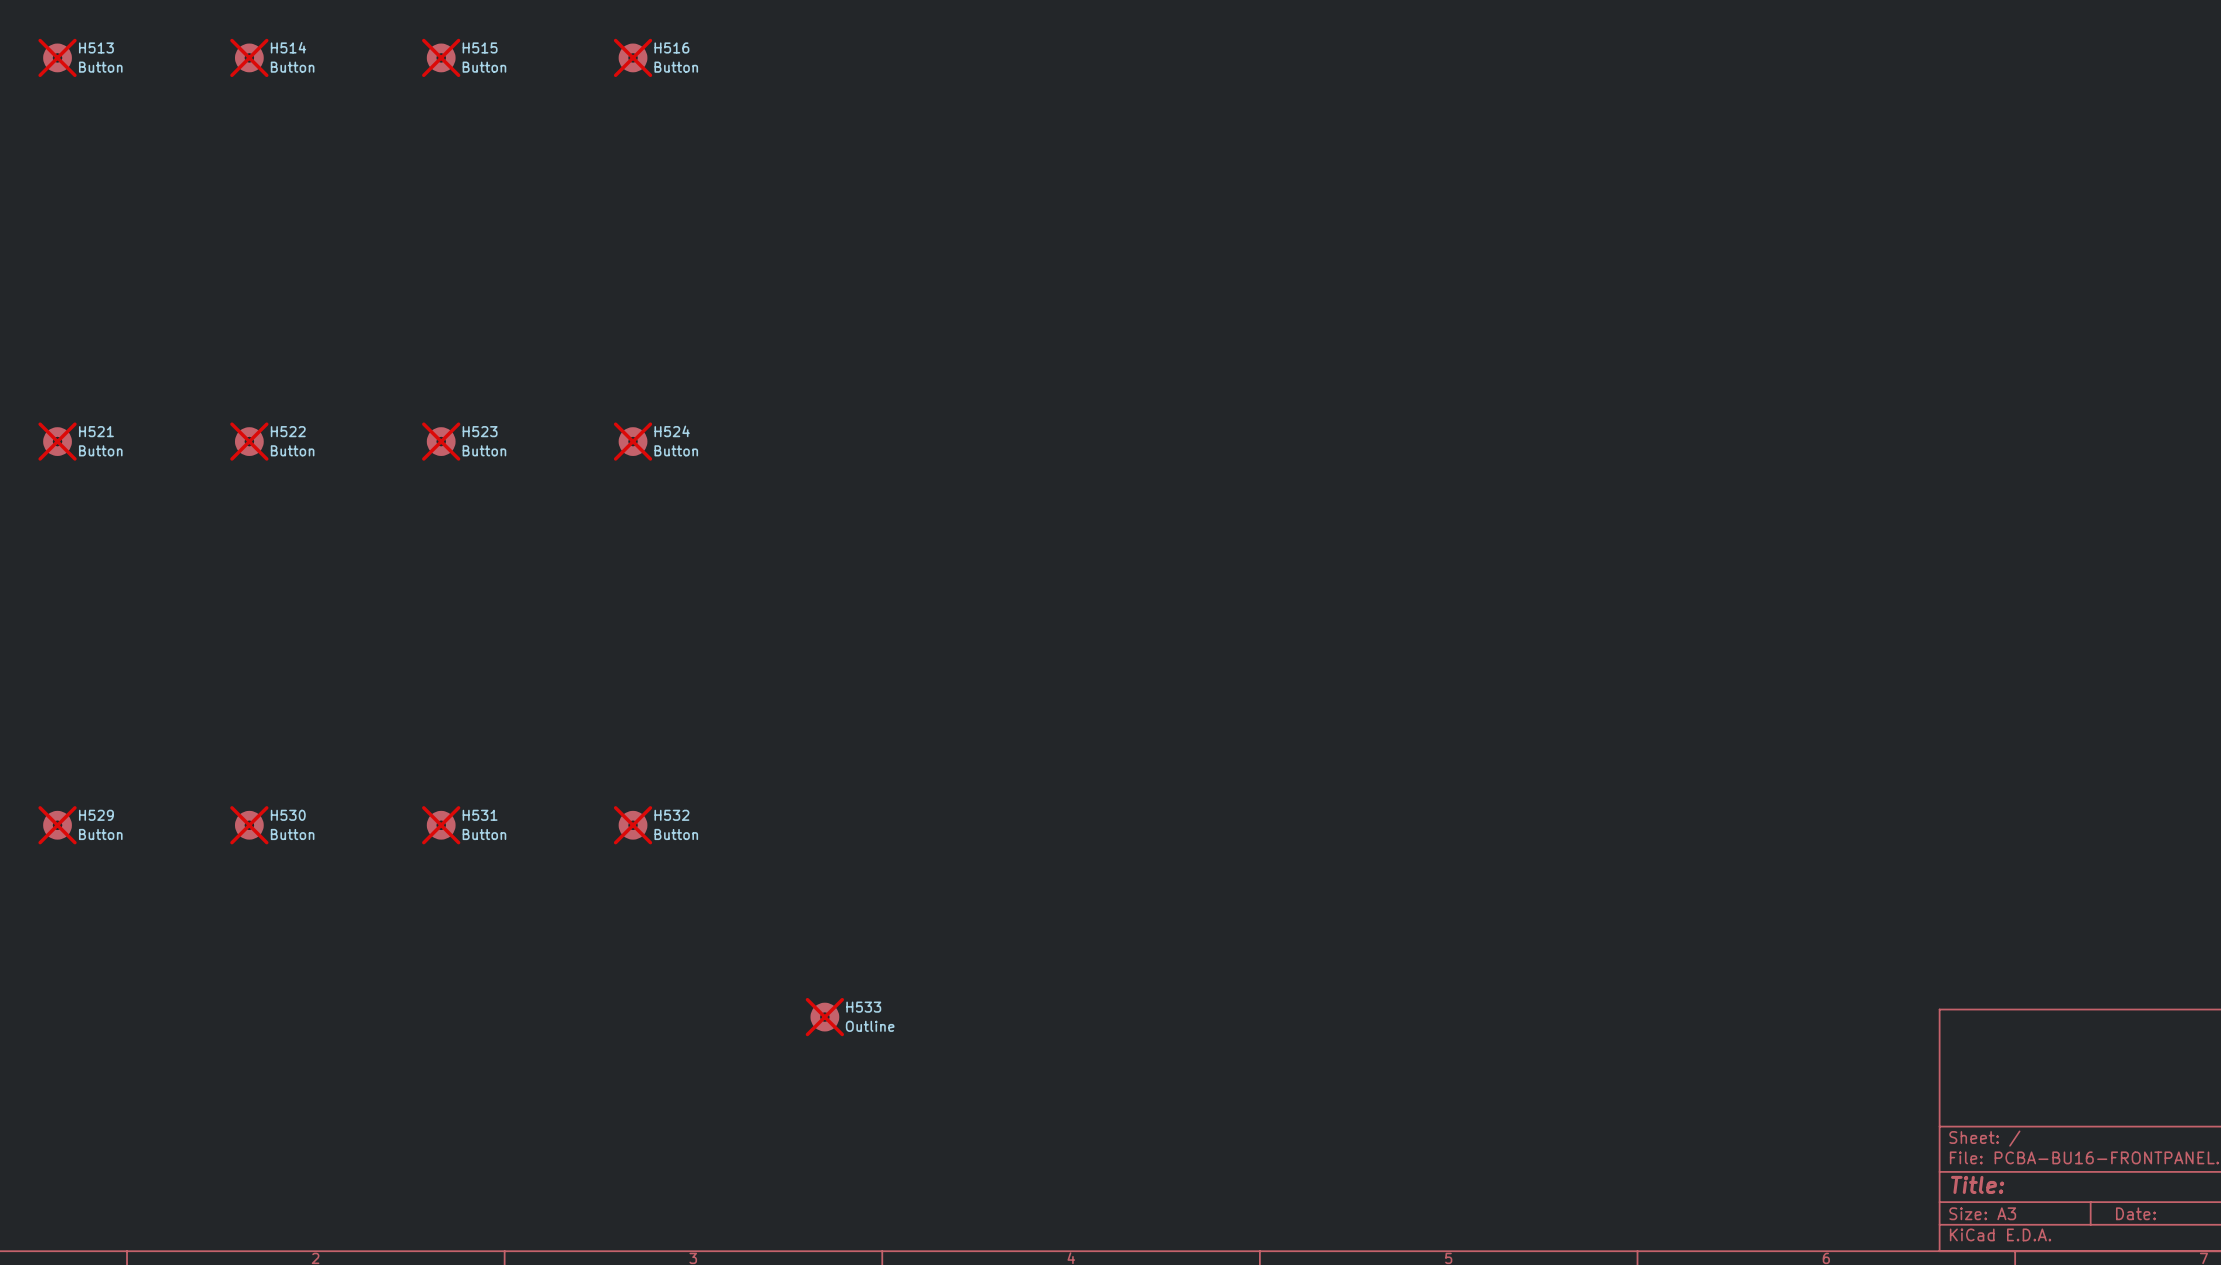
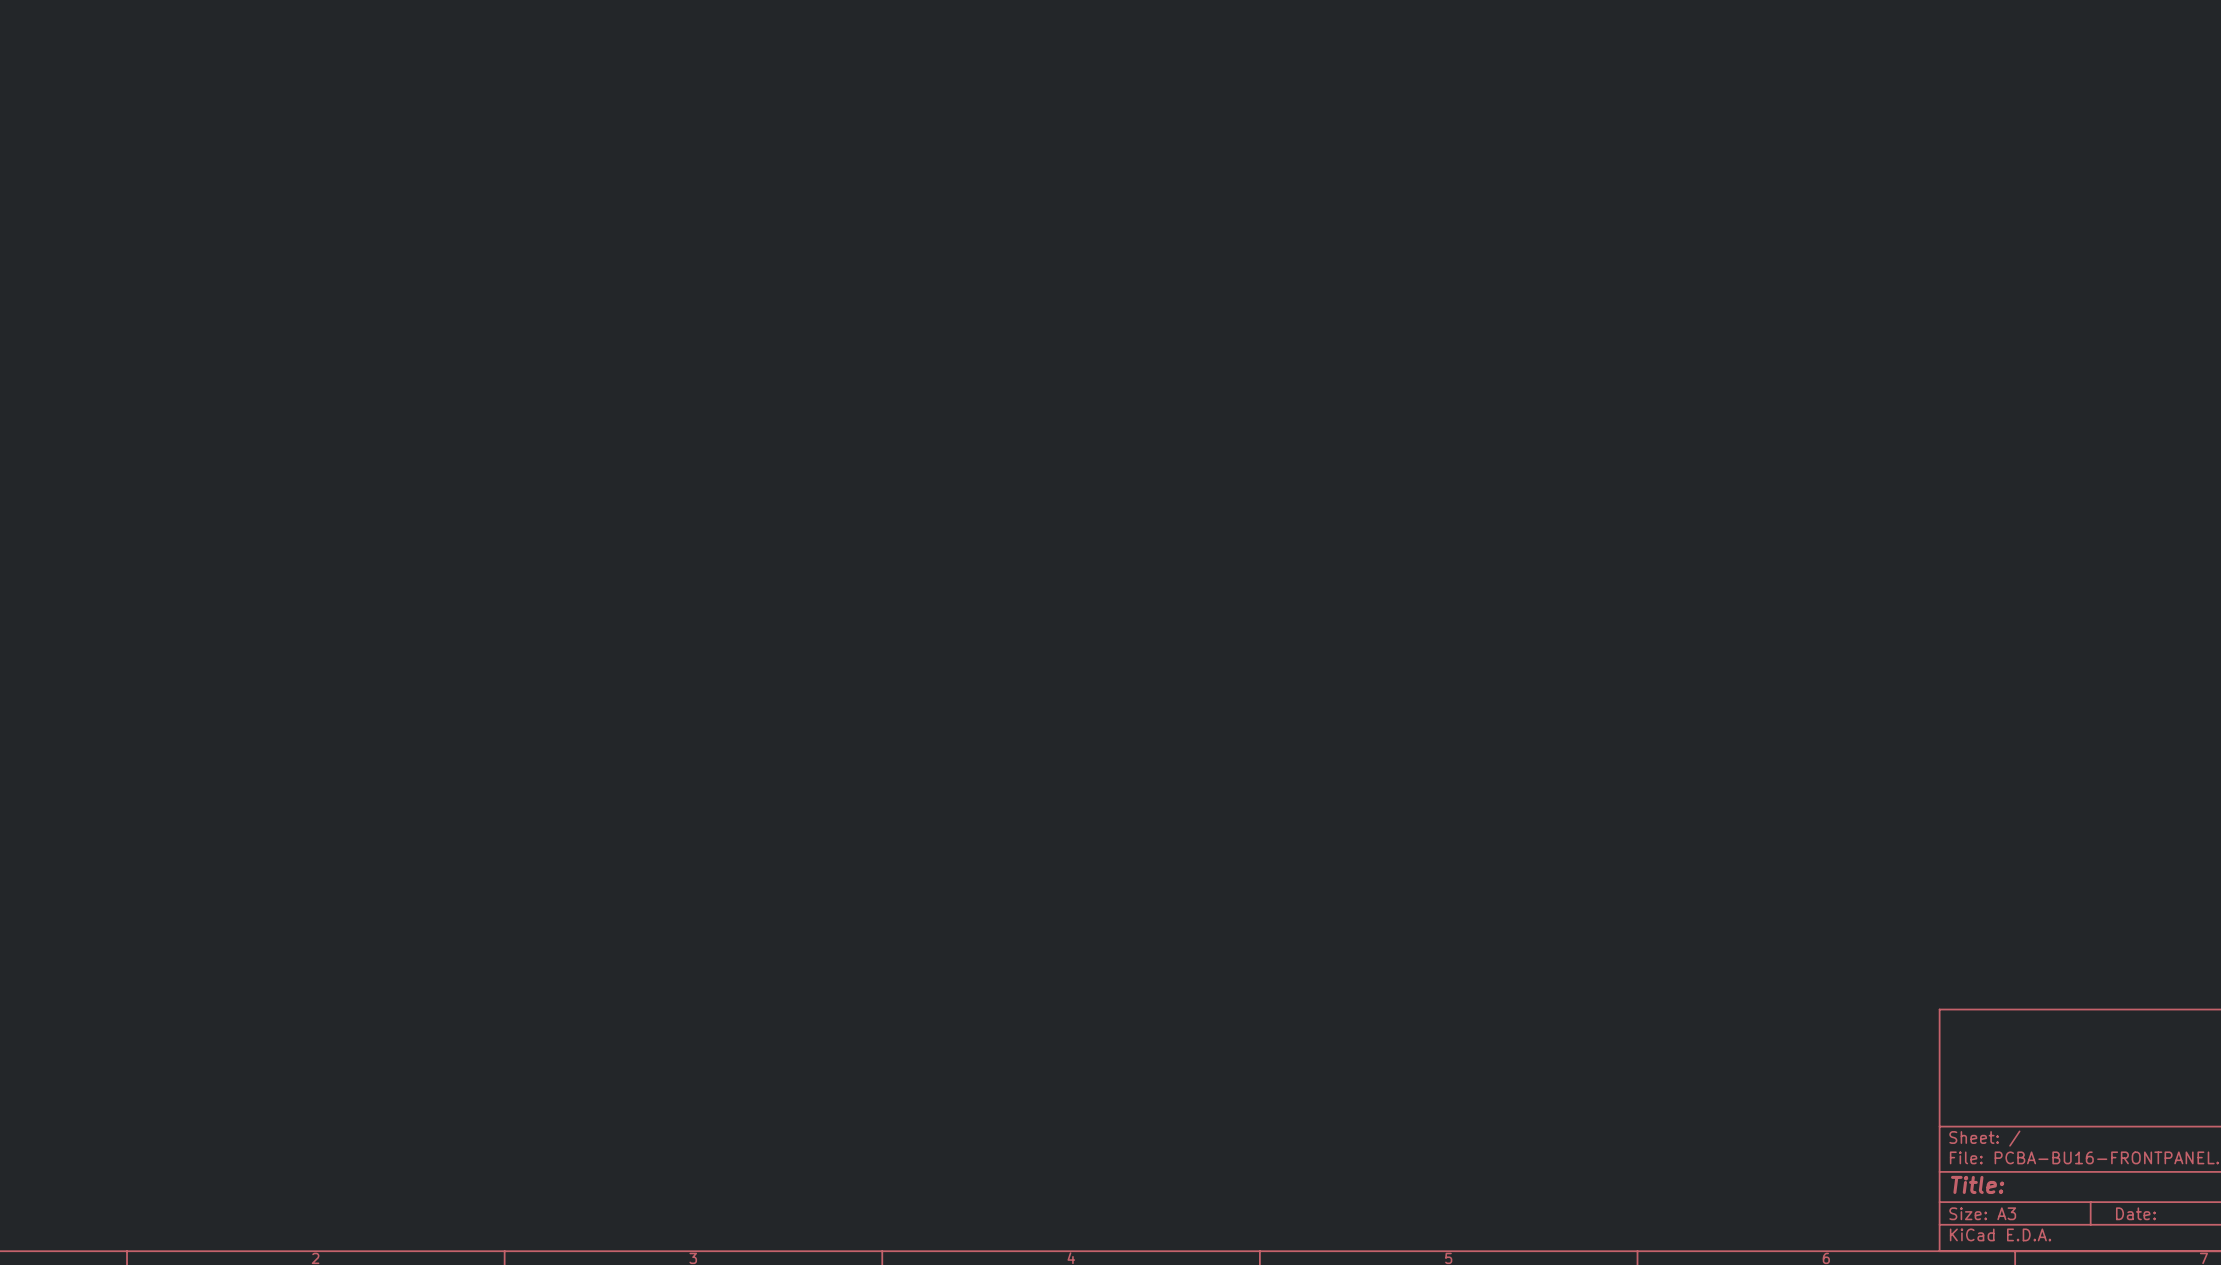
H513: Button (57, 57) -> none
H514: Button (249, 57) -> none
H515: Button (441, 57) -> none
H516: Button (633, 57) -> none
H521: Button (57, 441) -> none
H522: Button (249, 441) -> none
H523: Button (441, 441) -> none
H524: Button (633, 441) -> none
H529: Button (57, 825) -> none
H530: Button (249, 825) -> none
H531: Button (441, 825) -> none
H532: Button (633, 825) -> none
H533: Outline (824, 1017) -> none

